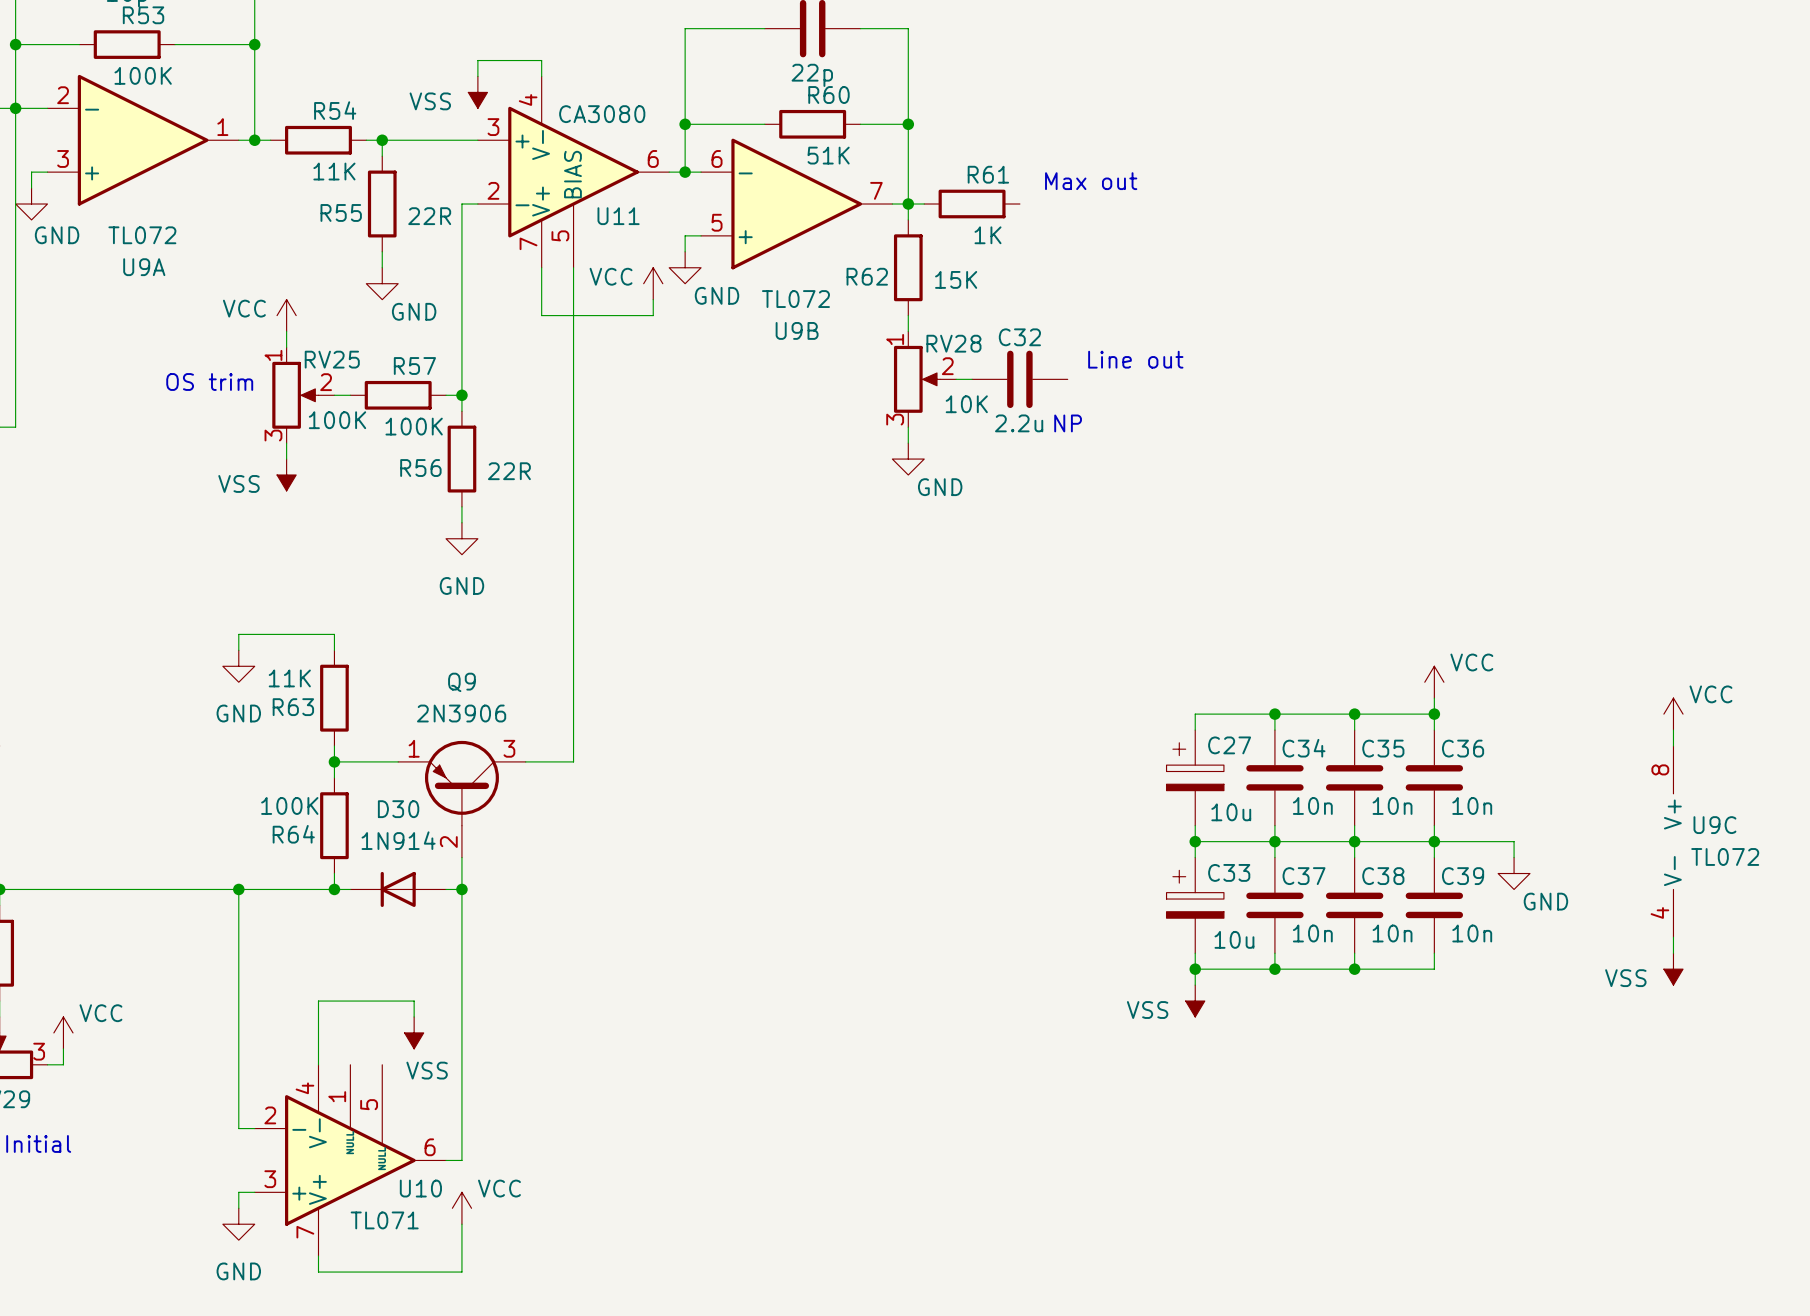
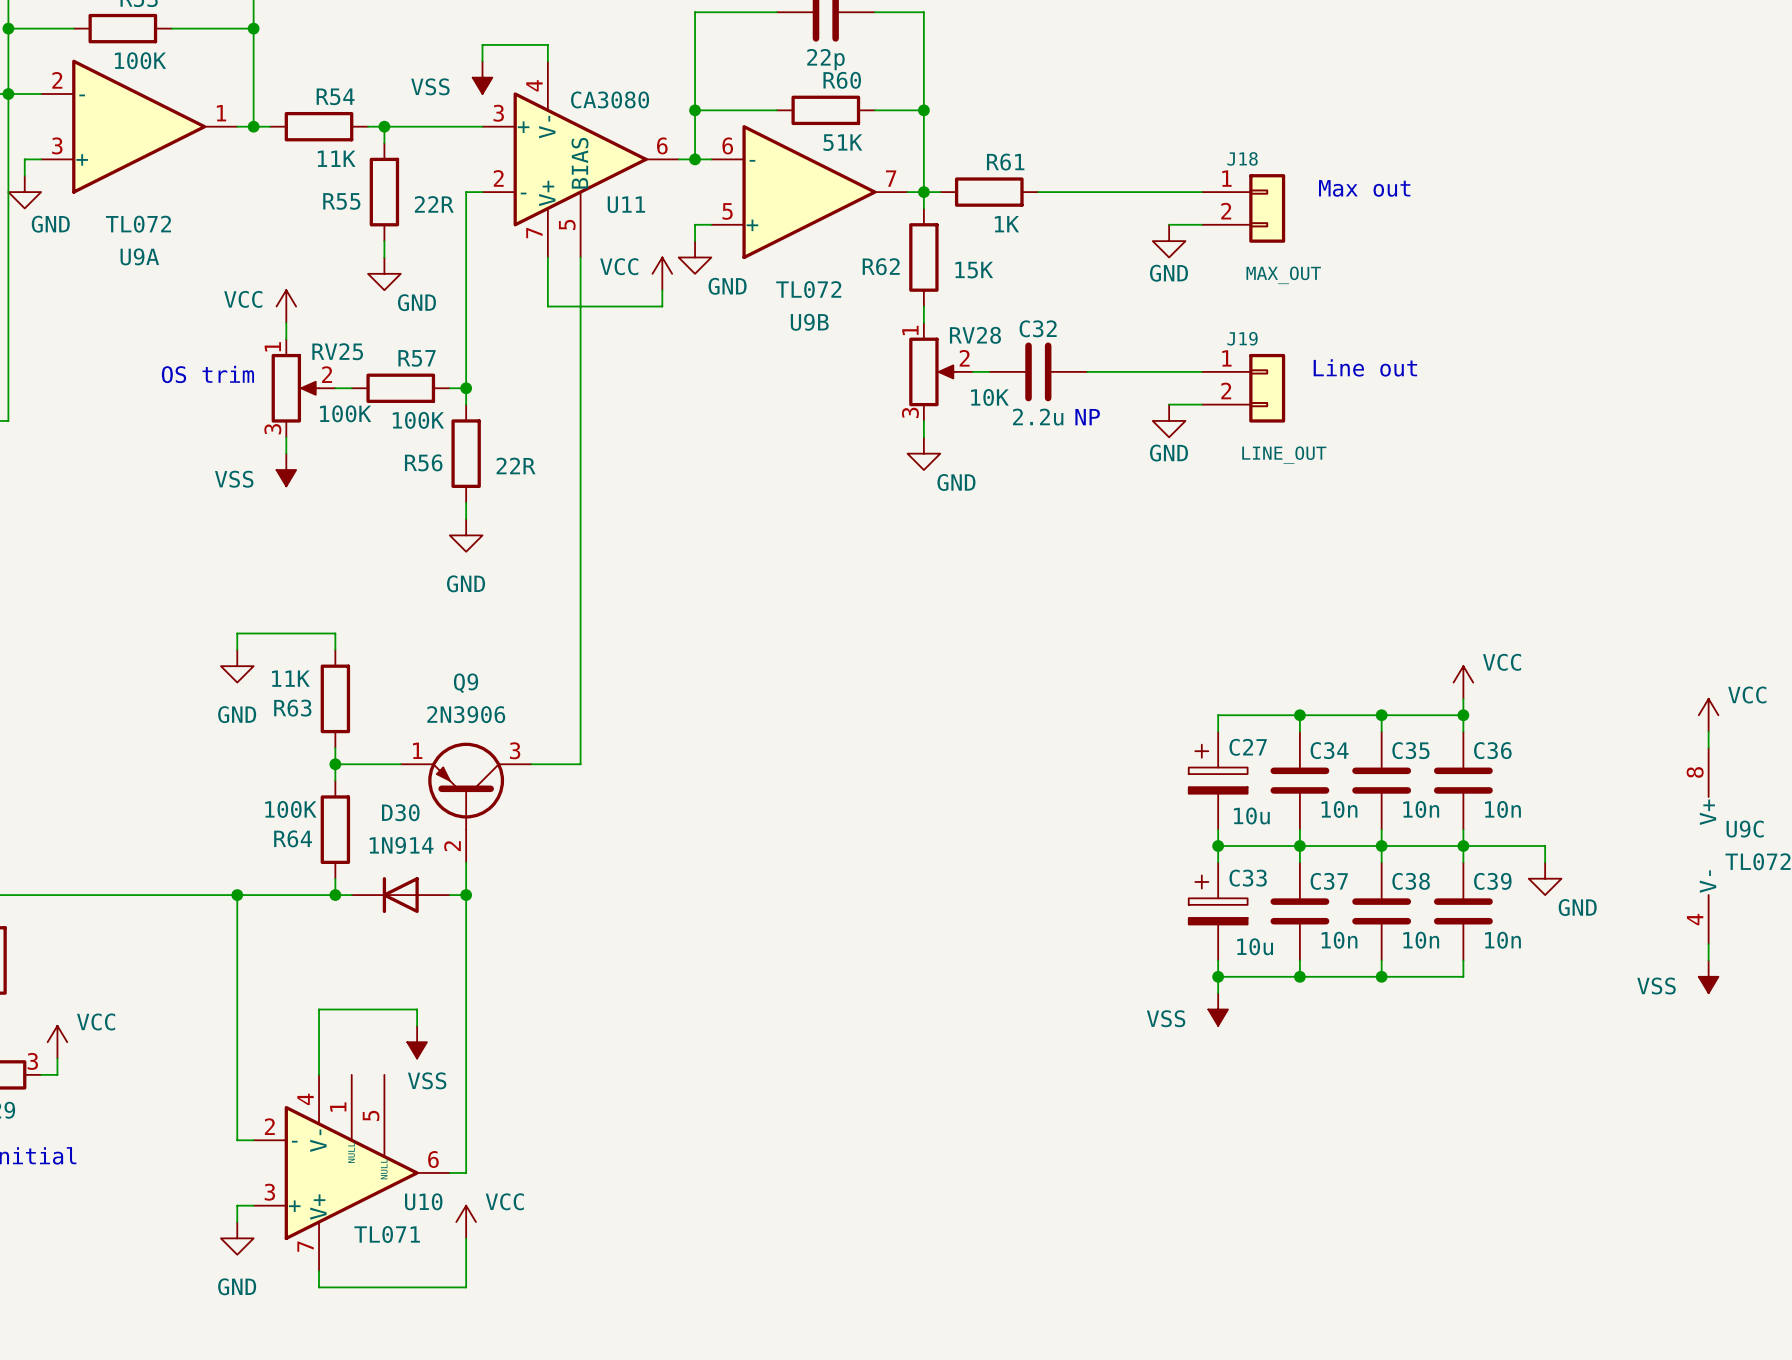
text position: Max out (1091, 181) -> Max out (1364, 188)
wire: none -> (1038, 192) (1201, 192)
J18: none -> MAX_OUT (1243, 208)
wire: none -> (1169, 224) (1201, 224)
power symbol: none -> GND (1169, 241)
text position: Line out (1135, 359) -> Line out (1365, 367)
wire: none -> (1087, 371) (1201, 371)
J19: none -> LINE_OUT (1243, 388)
wire: none -> (1169, 404) (1201, 404)
power symbol: none -> GND (1169, 420)

